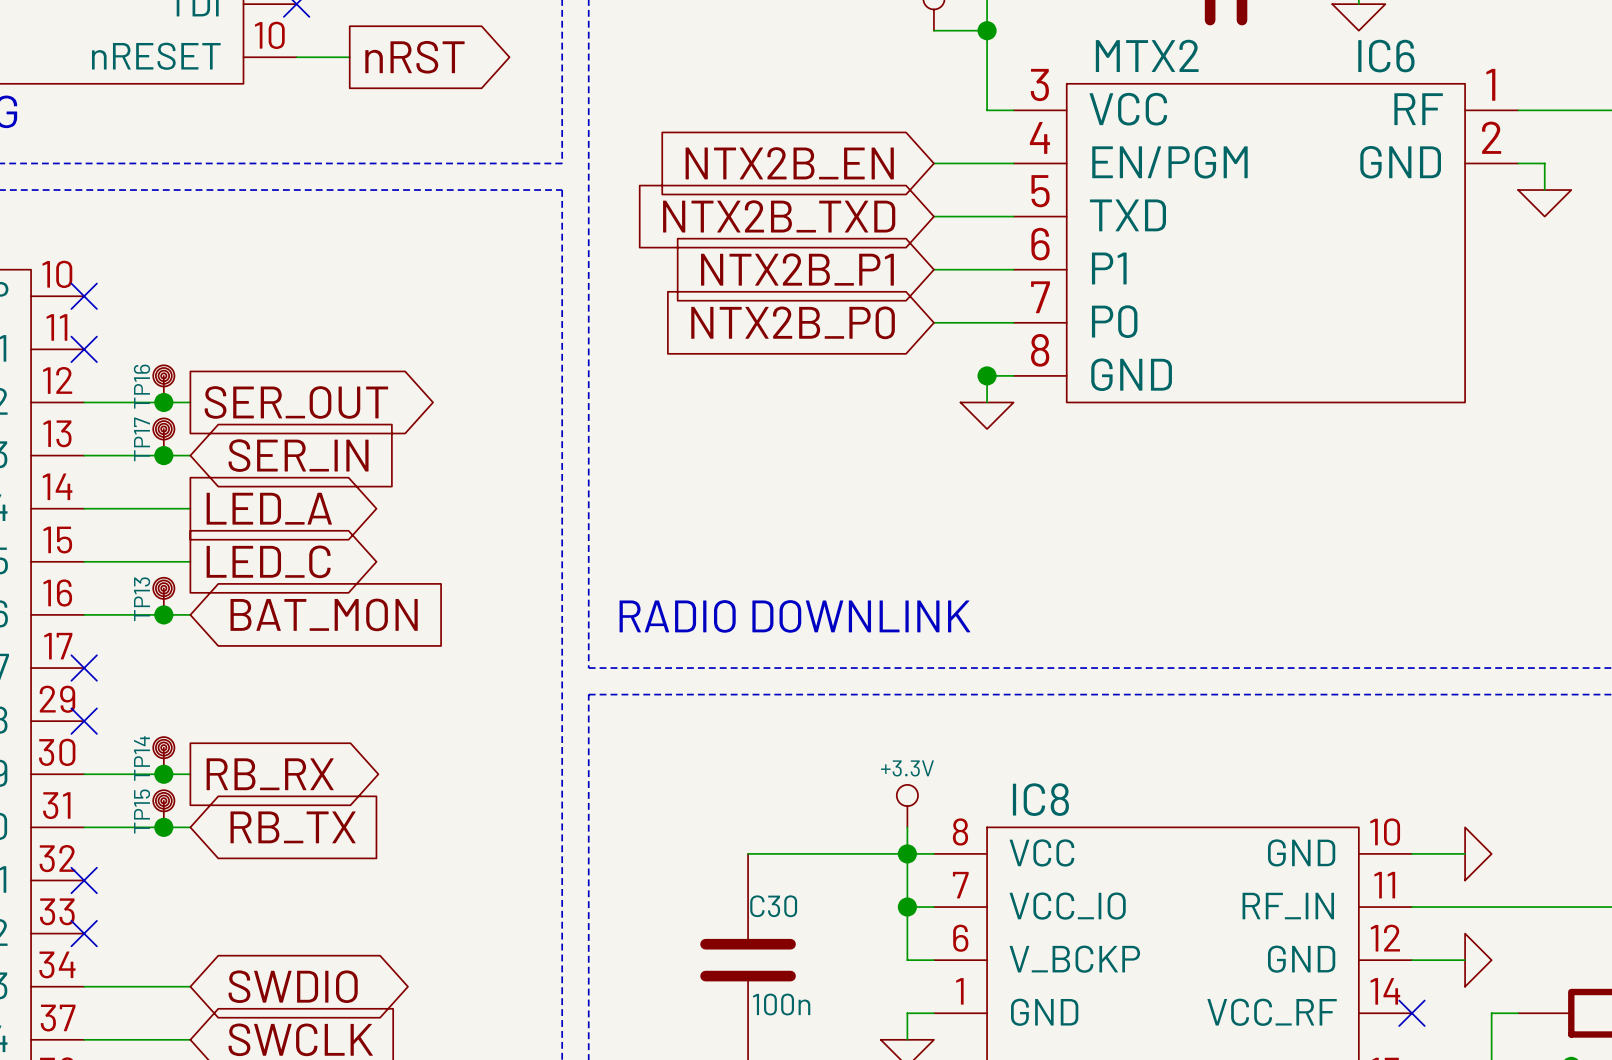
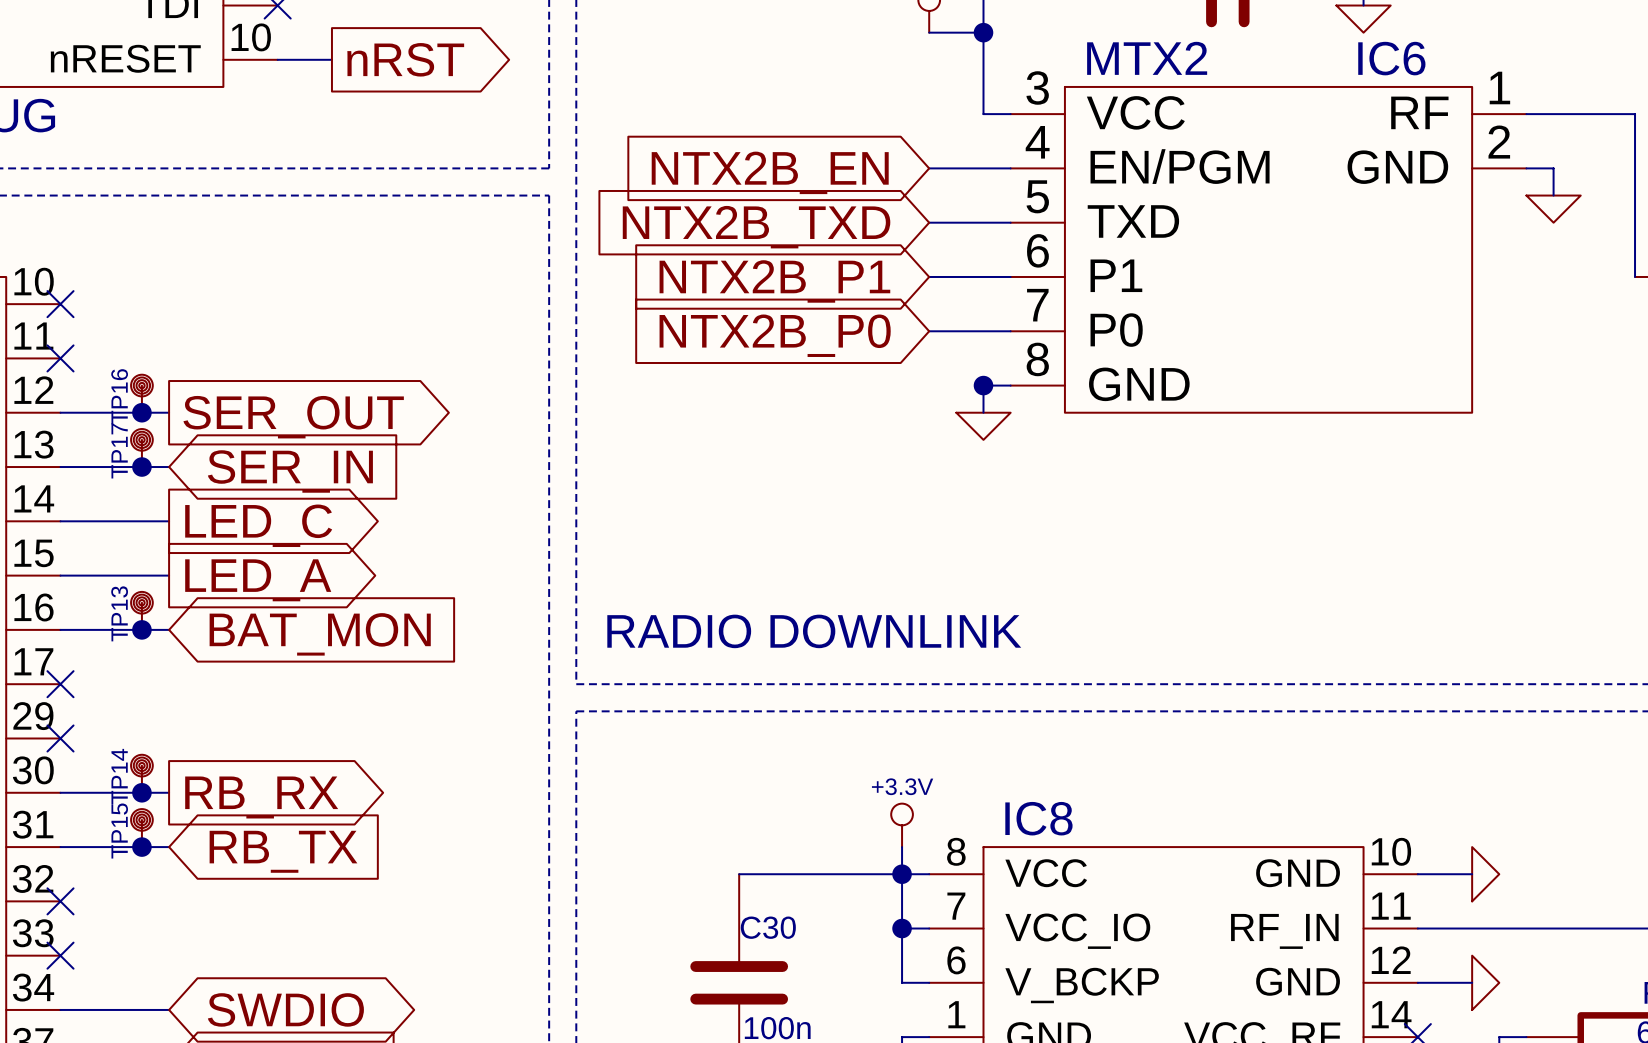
global label: LED_A (269, 508) -> LED_C (258, 525)
global label: LED_C (268, 561) -> LED_A (258, 580)

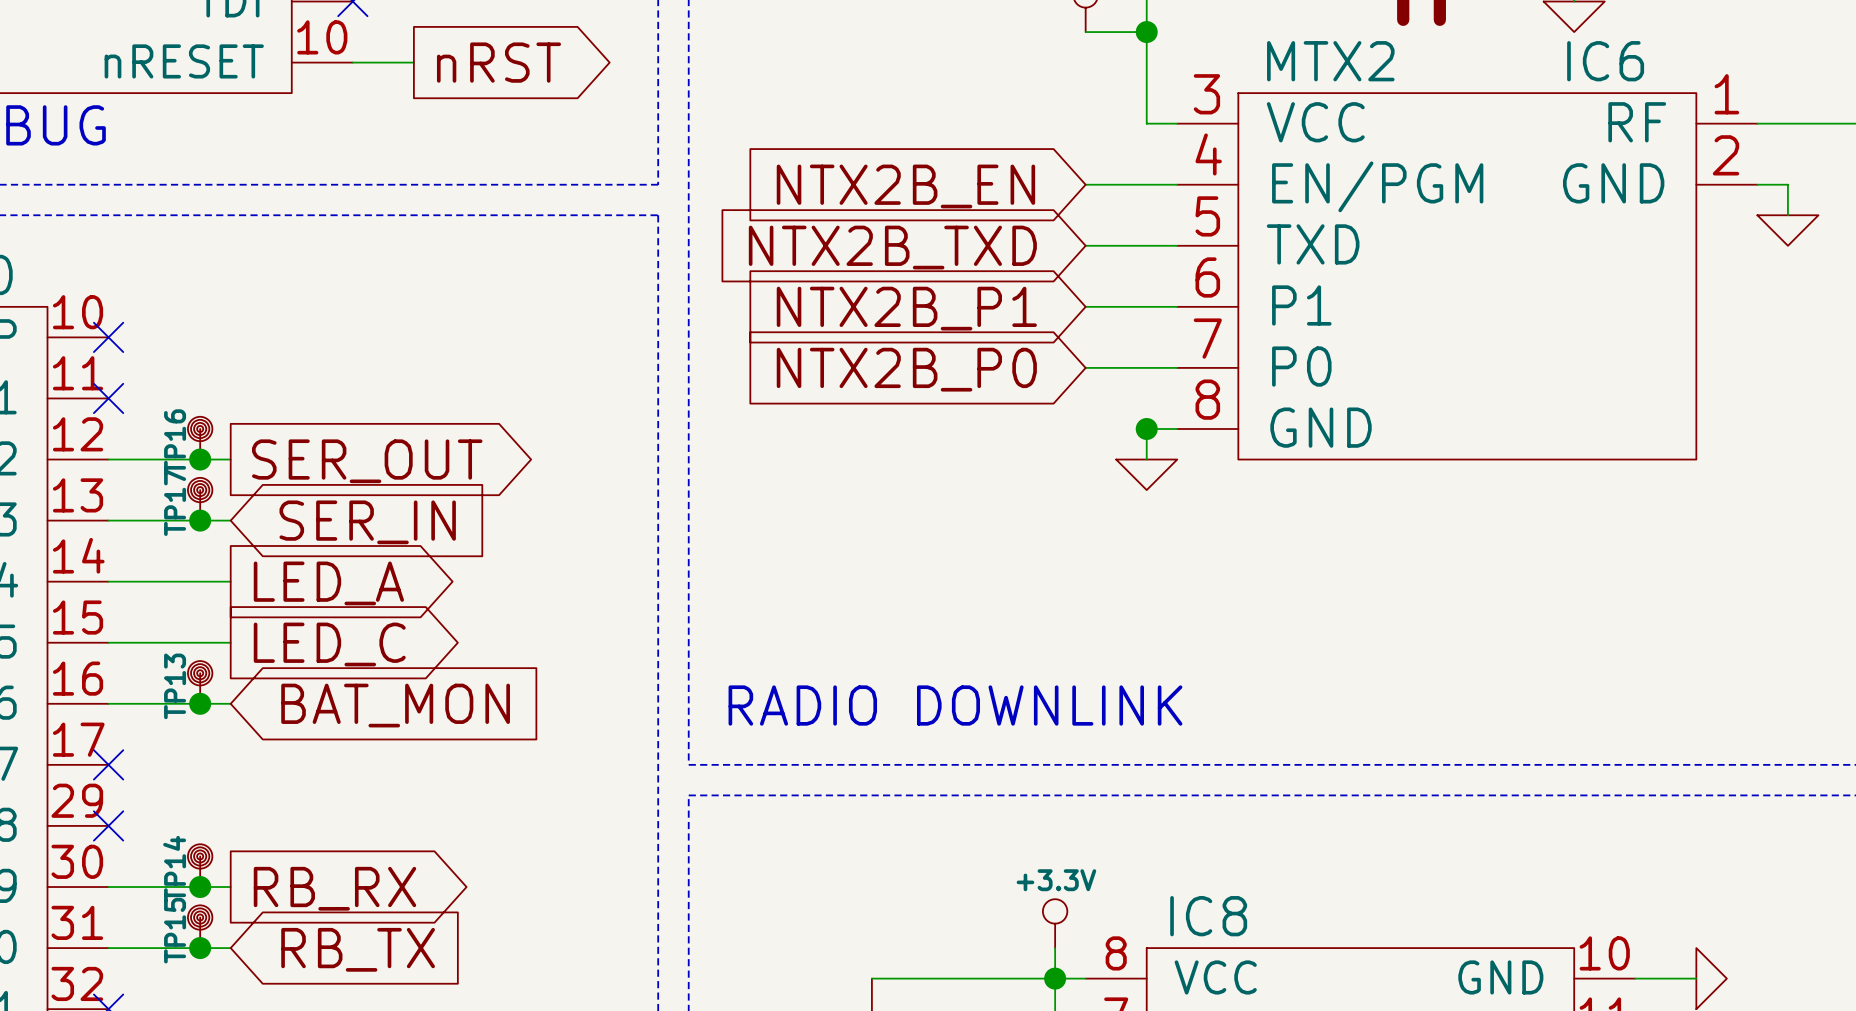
global label: LED_C (258, 525) -> LED_A (328, 583)
global label: LED_A (258, 580) -> LED_C (329, 644)

